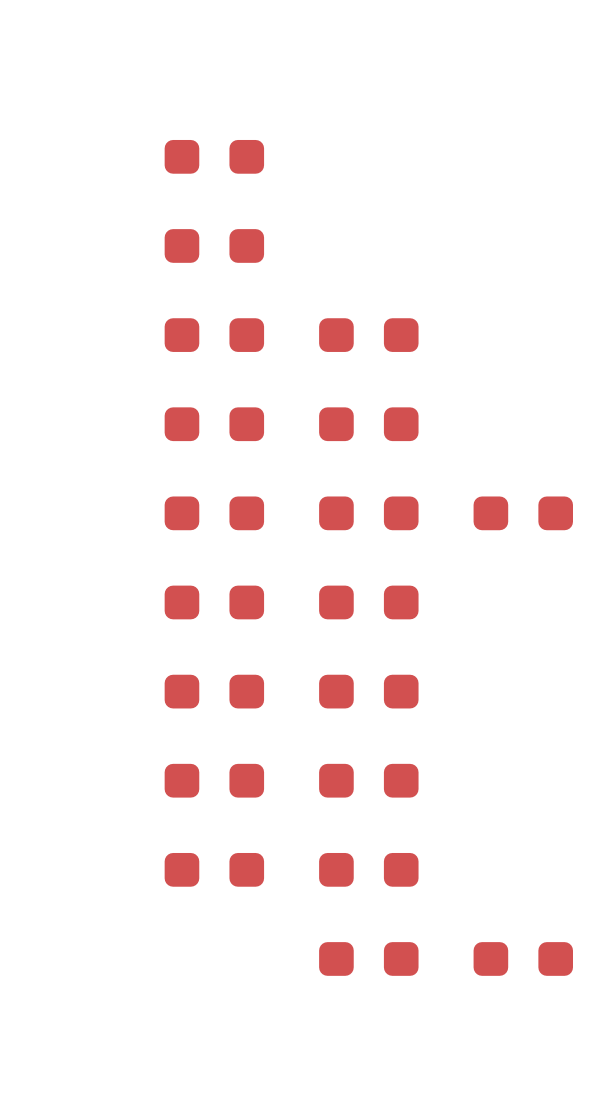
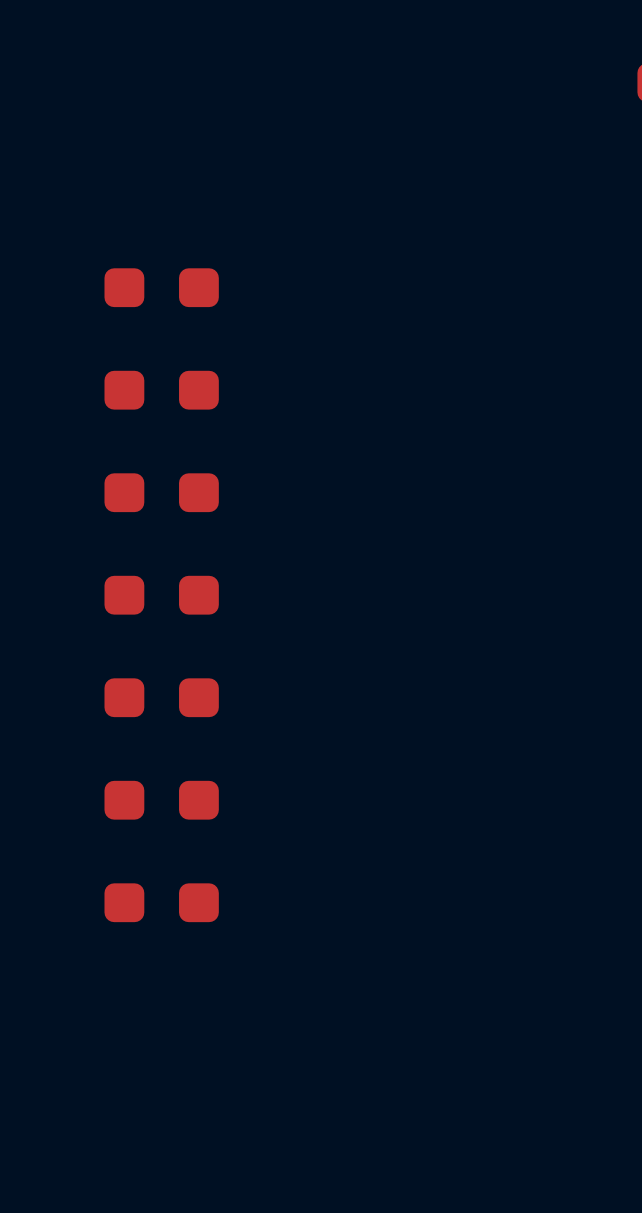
part: (214, 156) -> none
part: (214, 245) -> none
part: (368, 335) -> none
part: (368, 424) -> none
part: (368, 513) -> none
part: (523, 513) -> none
part: (368, 602) -> none
part: (368, 691) -> none
part: (368, 780) -> none
part: (368, 869) -> none
part: (368, 958) -> none
part: (523, 958) -> none

